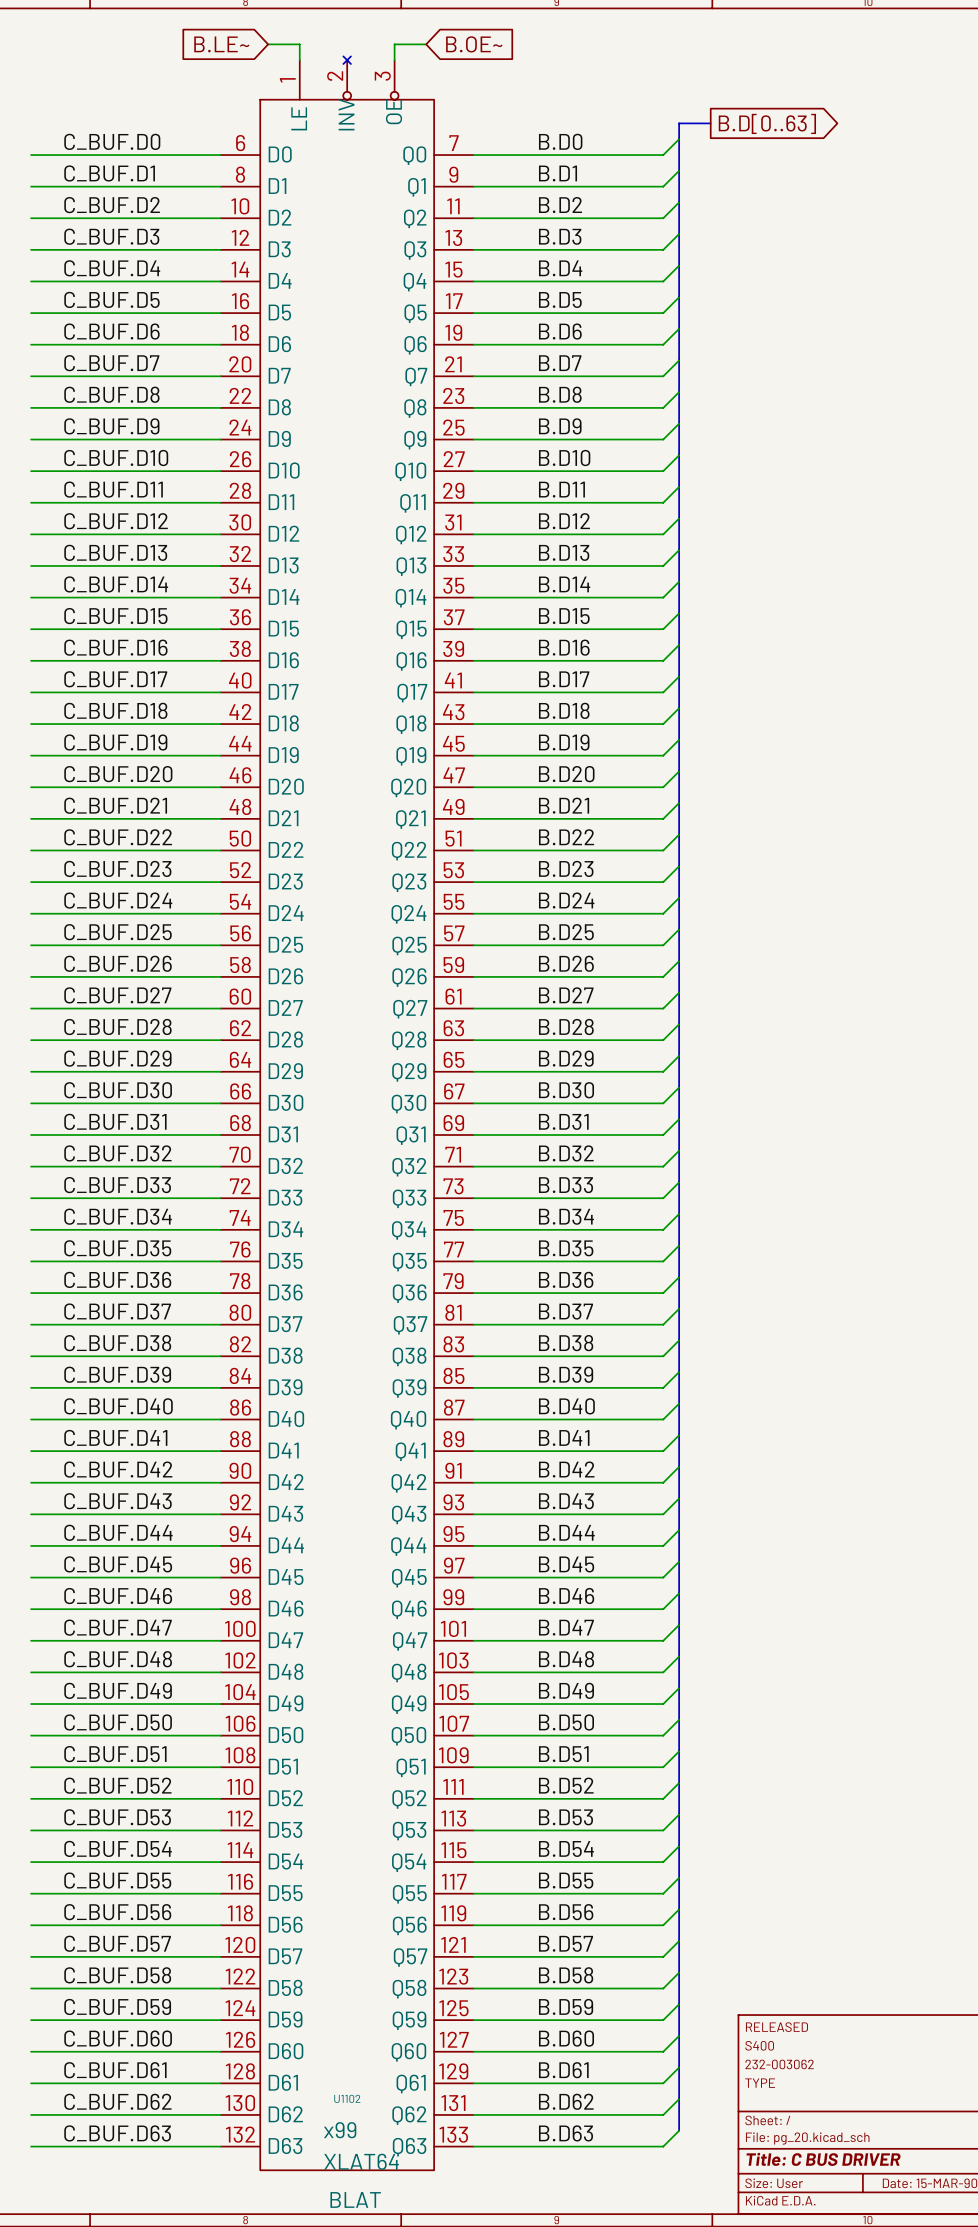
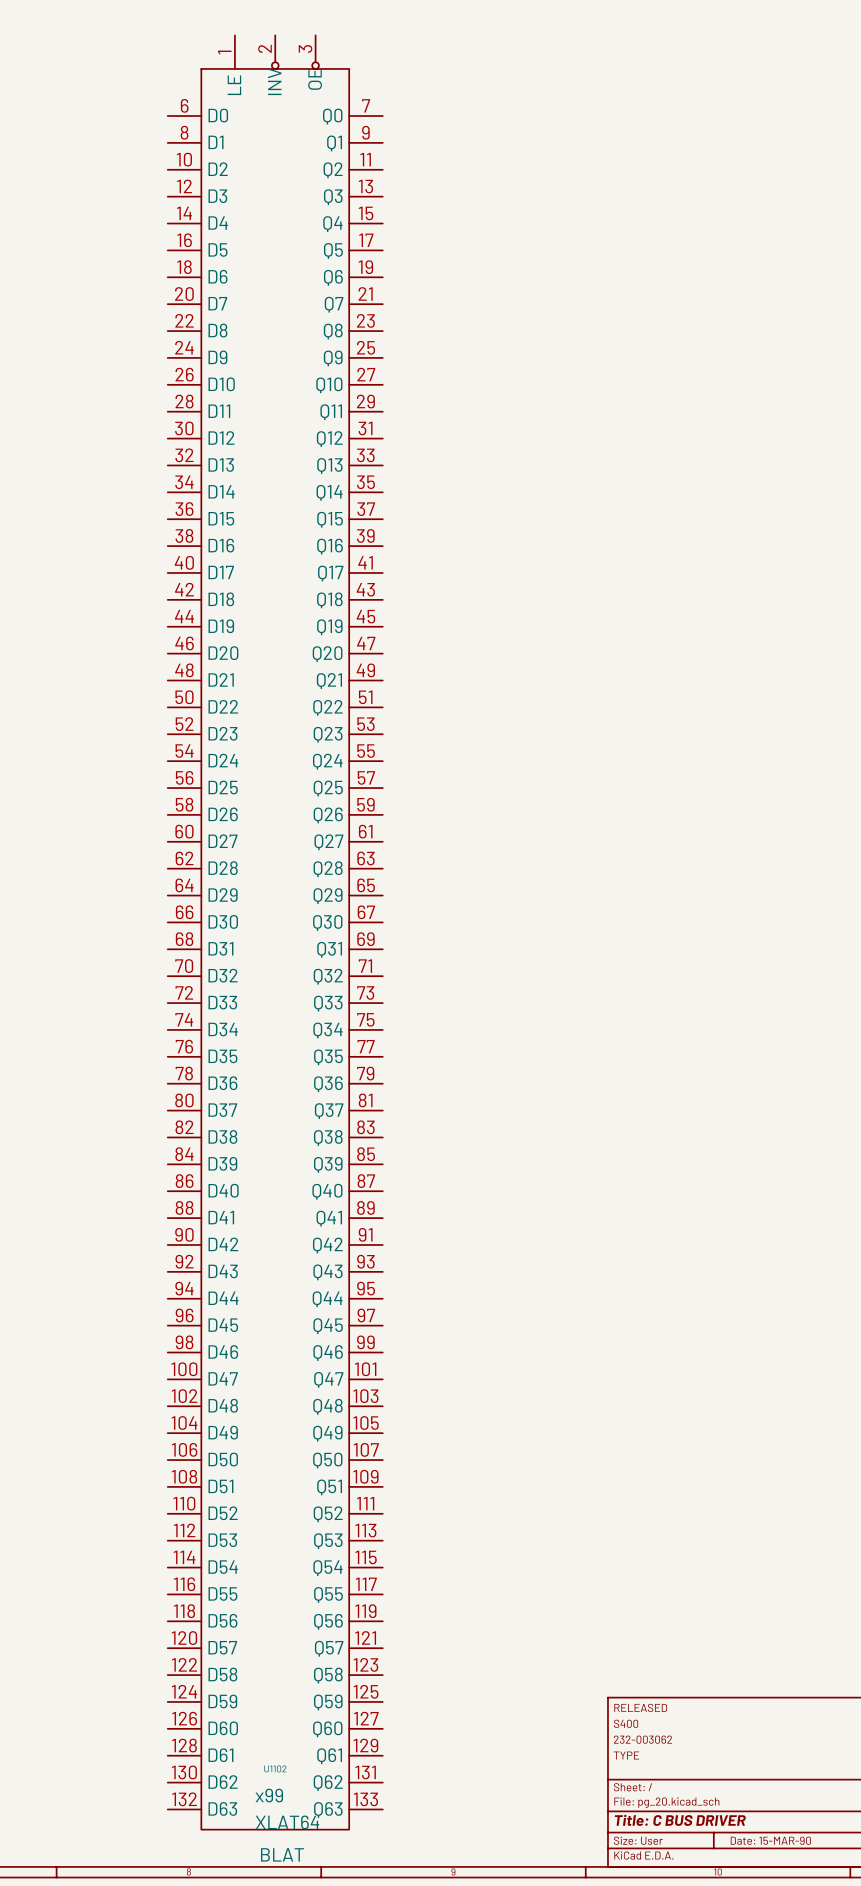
global label: B.LE~ (221, 44) -> none
wire: (268, 44) (299, 44) (299, 60) -> none
wire: (426, 44) (394, 44) (394, 60) -> none
global label: B.OE~ (474, 44) -> none
no-connect mark: (347, 60) -> none
bus: (710, 123) (679, 123) (679, 2130) -> none
global label: B.D[0..63] (767, 123) -> none
wire: (679, 139) (663, 155) (473, 155) -> none
label: C_BUF.D0 (112, 141) -> none
label: B.D0 (560, 141) -> none
wire: (31, 155) (220, 155) -> none
wire: (679, 170) (663, 186) (473, 186) -> none
label: C_BUF.D1 (109, 173) -> none
label: B.D1 (558, 173) -> none
wire: (31, 186) (220, 186) -> none
wire: (679, 202) (663, 218) (473, 218) -> none
label: C_BUF.D2 (112, 205) -> none
label: B.D2 (560, 205) -> none
wire: (31, 218) (220, 218) -> none
wire: (679, 234) (663, 249) (473, 249) -> none
label: C_BUF.D3 (111, 236) -> none
label: B.D3 (560, 236) -> none
wire: (31, 249) (220, 249) -> none
wire: (679, 265) (663, 281) (473, 281) -> none
label: C_BUF.D4 (112, 268) -> none
label: B.D4 (560, 268) -> none
wire: (31, 281) (220, 281) -> none
wire: (679, 297) (663, 313) (473, 313) -> none
label: C_BUF.D5 (111, 299) -> none
label: B.D5 (560, 300) -> none
wire: (31, 313) (220, 313) -> none
wire: (679, 328) (663, 344) (473, 344) -> none
label: C_BUF.D6 (111, 331) -> none
label: B.D6 (560, 331) -> none
wire: (31, 344) (220, 344) -> none
wire: (679, 360) (663, 376) (473, 376) -> none
label: C_BUF.D7 (111, 363) -> none
label: B.D7 (560, 363) -> none
wire: (31, 376) (220, 376) -> none
wire: (679, 392) (663, 407) (473, 407) -> none
label: C_BUF.D8 (111, 394) -> none
label: B.D8 (560, 394) -> none
wire: (31, 407) (220, 407) -> none
wire: (679, 423) (663, 439) (473, 439) -> none
label: C_BUF.D9 (111, 426) -> none
label: B.D9 (560, 426) -> none
wire: (31, 439) (220, 439) -> none
wire: (679, 455) (663, 471) (473, 471) -> none
label: C_BUF.D10 (116, 458) -> none
label: B.D10 (564, 458) -> none
wire: (31, 471) (220, 471) -> none
wire: (679, 486) (663, 502) (473, 502) -> none
label: C_BUF.D11 (113, 489) -> none
label: B.D11 (561, 489) -> none
wire: (31, 502) (220, 502) -> none
wire: (679, 518) (663, 534) (473, 534) -> none
label: C_BUF.D12 (116, 521) -> none
label: B.D12 (564, 521) -> none
wire: (31, 534) (220, 534) -> none
wire: (679, 550) (663, 565) (473, 565) -> none
label: C_BUF.D13 (115, 552) -> none
label: B.D13 (564, 552) -> none
wire: (31, 565) (220, 565) -> none
wire: (679, 581) (663, 597) (473, 597) -> none
label: C_BUF.D14 (116, 584) -> none
label: B.D14 (564, 584) -> none
wire: (31, 597) (220, 597) -> none
wire: (679, 613) (663, 629) (473, 629) -> none
label: C_BUF.D15 (115, 616) -> none
label: B.D15 (564, 616) -> none
wire: (31, 629) (220, 629) -> none
wire: (679, 645) (663, 660) (473, 660) -> none
label: C_BUF.D16 (115, 647) -> none
label: B.D16 (564, 647) -> none
wire: (31, 660) (220, 660) -> none
wire: (679, 676) (663, 692) (473, 692) -> none
label: C_BUF.D17 (115, 679) -> none
label: B.D17 (564, 679) -> none
wire: (31, 692) (220, 692) -> none
wire: (679, 708) (663, 724) (473, 724) -> none
label: C_BUF.D18 (115, 710) -> none
label: B.D18 (564, 710) -> none
wire: (31, 724) (220, 724) -> none
wire: (679, 739) (663, 755) (473, 755) -> none
label: C_BUF.D19 (115, 742) -> none
label: B.D19 (564, 742) -> none
wire: (31, 755) (220, 755) -> none
wire: (679, 771) (663, 787) (473, 787) -> none
label: C_BUF.D20 (118, 774) -> none
label: B.D20 (566, 774) -> none
wire: (31, 787) (220, 787) -> none
wire: (679, 803) (663, 818) (473, 818) -> none
label: C_BUF.D21 (115, 805) -> none
label: B.D21 (564, 805) -> none
wire: (31, 818) (220, 818) -> none
wire: (679, 834) (663, 850) (473, 850) -> none
label: C_BUF.D22 (118, 837) -> none
label: B.D22 (566, 837) -> none
wire: (31, 850) (220, 850) -> none
wire: (679, 866) (663, 882) (473, 882) -> none
label: C_BUF.D23 (117, 868) -> none
label: B.D23 (566, 868) -> none
wire: (31, 882) (220, 882) -> none
wire: (679, 897) (663, 913) (473, 913) -> none
label: C_BUF.D24 (118, 900) -> none
label: B.D24 (566, 900) -> none
wire: (31, 913) (220, 913) -> none
wire: (679, 929) (663, 945) (473, 945) -> none
label: C_BUF.D25 (118, 932) -> none
label: B.D25 (566, 932) -> none
wire: (31, 945) (220, 945) -> none
wire: (679, 961) (663, 976) (473, 976) -> none
label: C_BUF.D26 (118, 963) -> none
label: B.D26 (566, 963) -> none
wire: (31, 976) (220, 976) -> none
wire: (679, 992) (663, 1008) (473, 1008) -> none
label: C_BUF.D27 (117, 995) -> none
label: B.D27 (566, 995) -> none
wire: (31, 1008) (220, 1008) -> none
wire: (679, 1024) (663, 1040) (473, 1040) -> none
label: C_BUF.D28 (117, 1026) -> none
label: B.D28 (566, 1026) -> none
wire: (31, 1040) (220, 1040) -> none
wire: (679, 1055) (663, 1071) (473, 1071) -> none
label: C_BUF.D29 (117, 1058) -> none
label: B.D29 (566, 1058) -> none
wire: (31, 1071) (220, 1071) -> none
wire: (679, 1087) (663, 1103) (473, 1103) -> none
label: C_BUF.D30 (118, 1090) -> none
label: B.D30 (566, 1090) -> none
wire: (31, 1103) (220, 1103) -> none
wire: (679, 1119) (663, 1134) (473, 1134) -> none
label: C_BUF.D31 (115, 1121) -> none
label: B.D31 (563, 1121) -> none
wire: (31, 1134) (220, 1134) -> none
wire: (679, 1150) (663, 1166) (473, 1166) -> none
label: C_BUF.D32 (117, 1153) -> none
label: B.D32 (566, 1153) -> none
wire: (31, 1166) (220, 1166) -> none
wire: (679, 1182) (663, 1198) (473, 1198) -> none
label: C_BUF.D33 (117, 1185) -> none
label: B.D33 (565, 1185) -> none
wire: (31, 1198) (220, 1198) -> none
wire: (679, 1214) (663, 1229) (473, 1229) -> none
label: C_BUF.D34 (118, 1216) -> none
label: B.D34 (566, 1216) -> none
wire: (31, 1229) (220, 1229) -> none
wire: (679, 1245) (663, 1261) (473, 1261) -> none
label: C_BUF.D35 (117, 1248) -> none
label: B.D35 (566, 1248) -> none
wire: (31, 1261) (220, 1261) -> none
wire: (679, 1277) (663, 1293) (473, 1293) -> none
label: C_BUF.D36 (117, 1279) -> none
label: B.D36 (566, 1279) -> none
wire: (31, 1293) (220, 1293) -> none
wire: (679, 1308) (663, 1324) (473, 1324) -> none
label: C_BUF.D37 (117, 1311) -> none
label: B.D37 (566, 1311) -> none
wire: (31, 1324) (220, 1324) -> none
wire: (679, 1340) (663, 1356) (473, 1356) -> none
label: C_BUF.D38 (117, 1343) -> none
label: B.D38 (566, 1343) -> none
wire: (31, 1356) (220, 1356) -> none
wire: (679, 1372) (663, 1387) (473, 1387) -> none
label: C_BUF.D39 (117, 1374) -> none
label: B.D39 (566, 1374) -> none
wire: (31, 1387) (220, 1387) -> none
wire: (679, 1403) (663, 1419) (473, 1419) -> none
label: C_BUF.D40 (118, 1406) -> none
label: B.D40 (566, 1406) -> none
wire: (31, 1419) (220, 1419) -> none
wire: (679, 1435) (663, 1451) (473, 1451) -> none
label: C_BUF.D41 (115, 1437) -> none
label: B.D41 (564, 1437) -> none
wire: (31, 1451) (220, 1451) -> none
wire: (679, 1466) (663, 1482) (473, 1482) -> none
label: C_BUF.D42 (118, 1469) -> none
label: B.D42 (566, 1469) -> none
wire: (31, 1482) (220, 1482) -> none
wire: (679, 1498) (663, 1514) (473, 1514) -> none
label: C_BUF.D43 (118, 1501) -> none
label: B.D43 (566, 1501) -> none
wire: (31, 1514) (220, 1514) -> none
wire: (679, 1530) (663, 1545) (473, 1545) -> none
label: C_BUF.D44 (118, 1532) -> none
label: B.D44 (566, 1532) -> none
wire: (31, 1545) (220, 1545) -> none
wire: (679, 1561) (663, 1577) (473, 1577) -> none
label: C_BUF.D45 (118, 1564) -> none
label: B.D45 (566, 1564) -> none
wire: (31, 1577) (220, 1577) -> none
wire: (679, 1593) (663, 1609) (473, 1609) -> none
label: C_BUF.D46 (118, 1596) -> none
label: B.D46 (566, 1596) -> none
wire: (31, 1609) (220, 1609) -> none
wire: (679, 1624) (663, 1640) (473, 1640) -> none
label: C_BUF.D47 (118, 1627) -> none
label: B.D47 (566, 1627) -> none
wire: (31, 1640) (220, 1640) -> none
wire: (679, 1656) (663, 1672) (473, 1672) -> none
label: C_BUF.D48 (118, 1659) -> none
label: B.D48 (566, 1659) -> none
wire: (31, 1672) (220, 1672) -> none
wire: (679, 1688) (663, 1704) (473, 1704) -> none
label: C_BUF.D49 (118, 1690) -> none
label: B.D49 (566, 1690) -> none
wire: (31, 1704) (220, 1704) -> none
wire: (679, 1719) (663, 1735) (473, 1735) -> none
label: C_BUF.D50 (118, 1722) -> none
label: B.D50 (566, 1722) -> none
wire: (31, 1735) (220, 1735) -> none
wire: (679, 1751) (663, 1767) (473, 1767) -> none
label: C_BUF.D51 (115, 1754) -> none
label: B.D51 (563, 1754) -> none
wire: (31, 1767) (220, 1767) -> none
wire: (679, 1783) (663, 1798) (473, 1798) -> none
label: C_BUF.D52 (117, 1785) -> none
label: B.D52 (566, 1785) -> none
wire: (31, 1798) (220, 1798) -> none
wire: (679, 1814) (663, 1830) (473, 1830) -> none
label: C_BUF.D53 (117, 1817) -> none
label: B.D53 (565, 1817) -> none
wire: (31, 1830) (220, 1830) -> none
wire: (679, 1846) (663, 1862) (473, 1862) -> none
label: C_BUF.D54 (118, 1848) -> none
label: B.D54 (566, 1848) -> none
wire: (31, 1862) (220, 1862) -> none
wire: (679, 1877) (663, 1893) (473, 1893) -> none
label: C_BUF.D55 (117, 1880) -> none
label: B.D55 (566, 1880) -> none
wire: (31, 1893) (220, 1893) -> none
wire: (679, 1909) (663, 1925) (473, 1925) -> none
label: C_BUF.D56 (117, 1912) -> none
label: B.D56 (566, 1912) -> none
wire: (31, 1925) (220, 1925) -> none
wire: (679, 1941) (663, 1956) (473, 1956) -> none
label: C_BUF.D57 (117, 1943) -> none
label: B.D57 (565, 1943) -> none
wire: (31, 1956) (220, 1956) -> none
wire: (679, 1972) (663, 1988) (473, 1988) -> none
label: C_BUF.D58 (117, 1975) -> none
label: B.D58 (566, 1975) -> none
wire: (31, 1988) (220, 1988) -> none
wire: (679, 2004) (663, 2020) (473, 2020) -> none
label: C_BUF.D59 (117, 2006) -> none
label: B.D59 (566, 2006) -> none
wire: (31, 2020) (220, 2020) -> none
wire: (679, 2035) (663, 2051) (473, 2051) -> none
label: C_BUF.D60 (118, 2038) -> none
label: B.D60 (566, 2038) -> none
wire: (31, 2051) (220, 2051) -> none
wire: (679, 2067) (663, 2083) (473, 2083) -> none
label: C_BUF.D61 (115, 2070) -> none
label: B.D61 (563, 2070) -> none
wire: (31, 2083) (220, 2083) -> none
wire: (679, 2099) (663, 2114) (473, 2114) -> none
label: C_BUF.D62 (117, 2101) -> none
label: B.D62 (566, 2101) -> none
wire: (31, 2114) (220, 2114) -> none
wire: (679, 2130) (663, 2146) (473, 2146) -> none
label: C_BUF.D63 (117, 2133) -> none
label: B.D63 (565, 2133) -> none
wire: (31, 2146) (220, 2146) -> none

